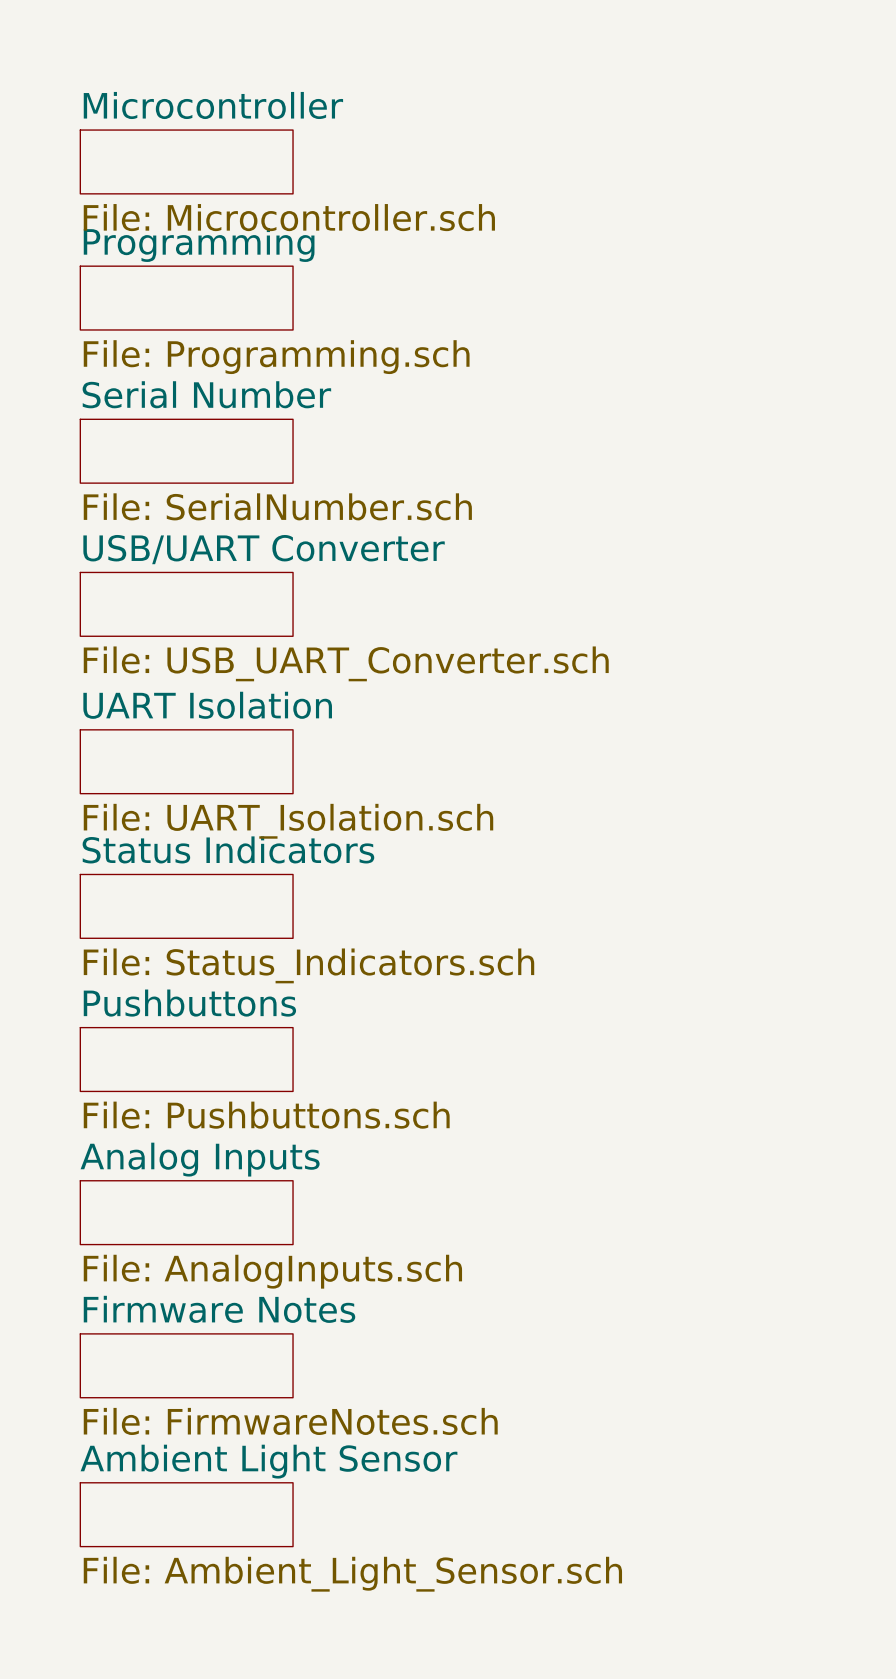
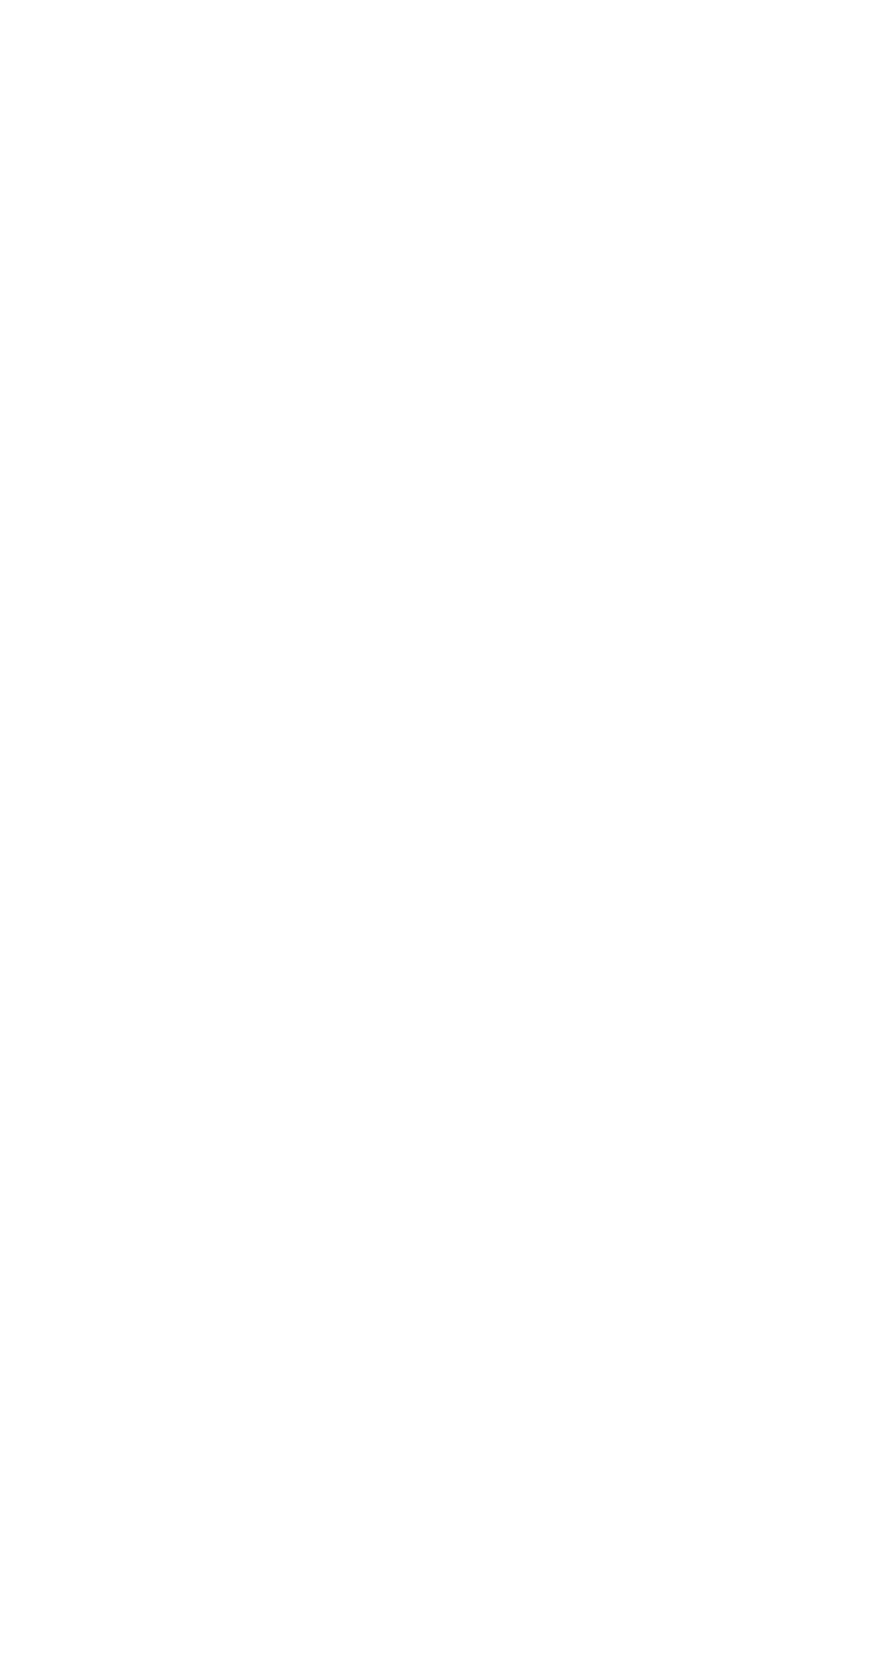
sheet Microcontroller: File: Microcontroller.sch (186, 161) -> none
sheet Programming: File: Programming.sch (186, 298) -> none
sheet Serial Number: File: SerialNumber.sch (186, 451) -> none
sheet USB/UART Converter: File: USB_UART_Converter.sch (186, 604) -> none
sheet UART Isolation: File: UART_Isolation.sch (186, 761) -> none
sheet Status Indicators: File: Status_Indicators.sch (186, 906) -> none
sheet Pushbuttons: File: Pushbuttons.sch (186, 1059) -> none
sheet Analog Inputs: File: AnalogInputs.sch (186, 1212) -> none
sheet Firmware Notes: File: FirmwareNotes.sch (186, 1365) -> none
sheet Ambient Light Sensor: File: Ambient_Light_Sensor.sch (186, 1514) -> none

